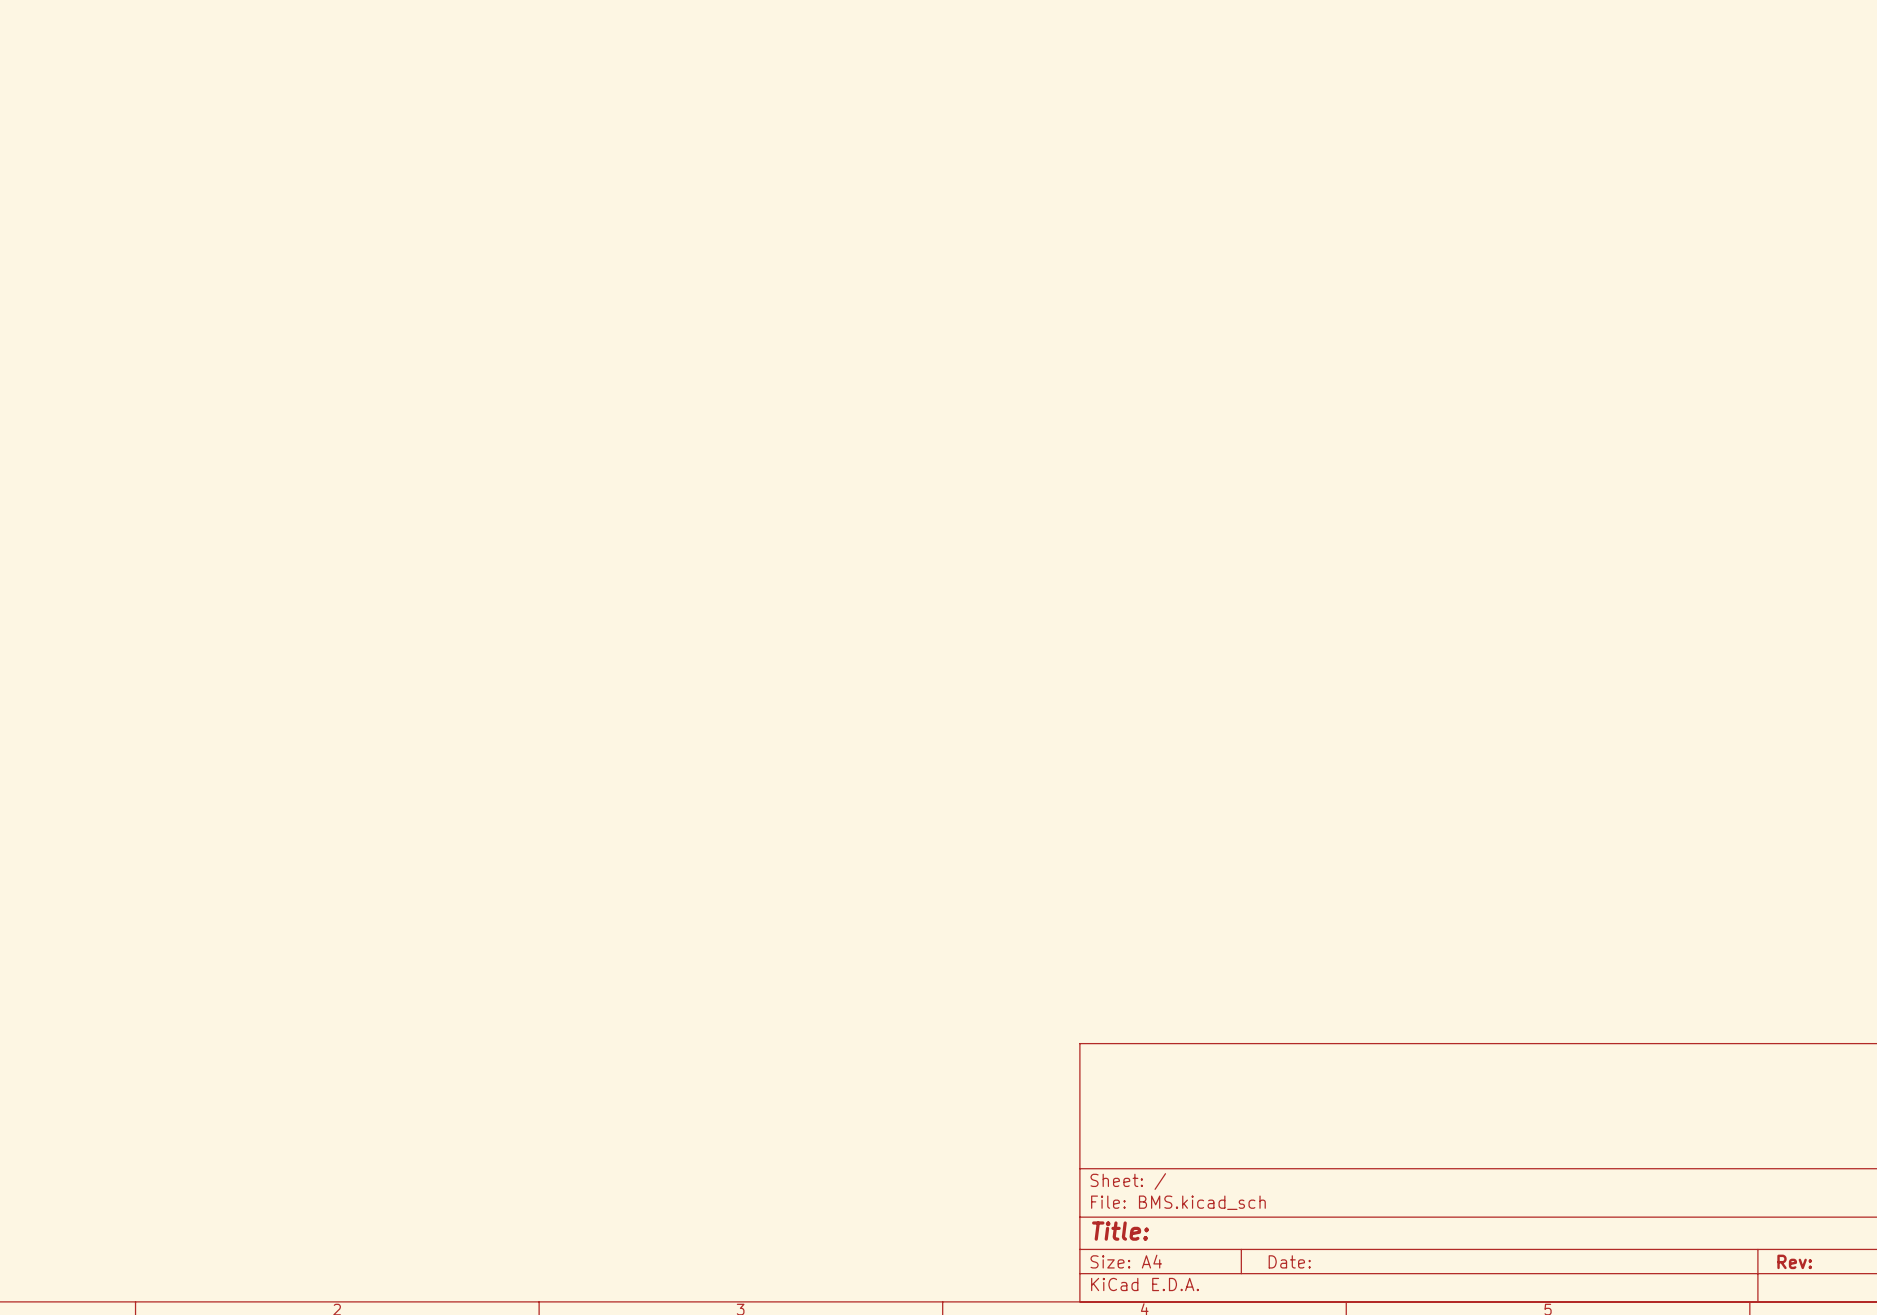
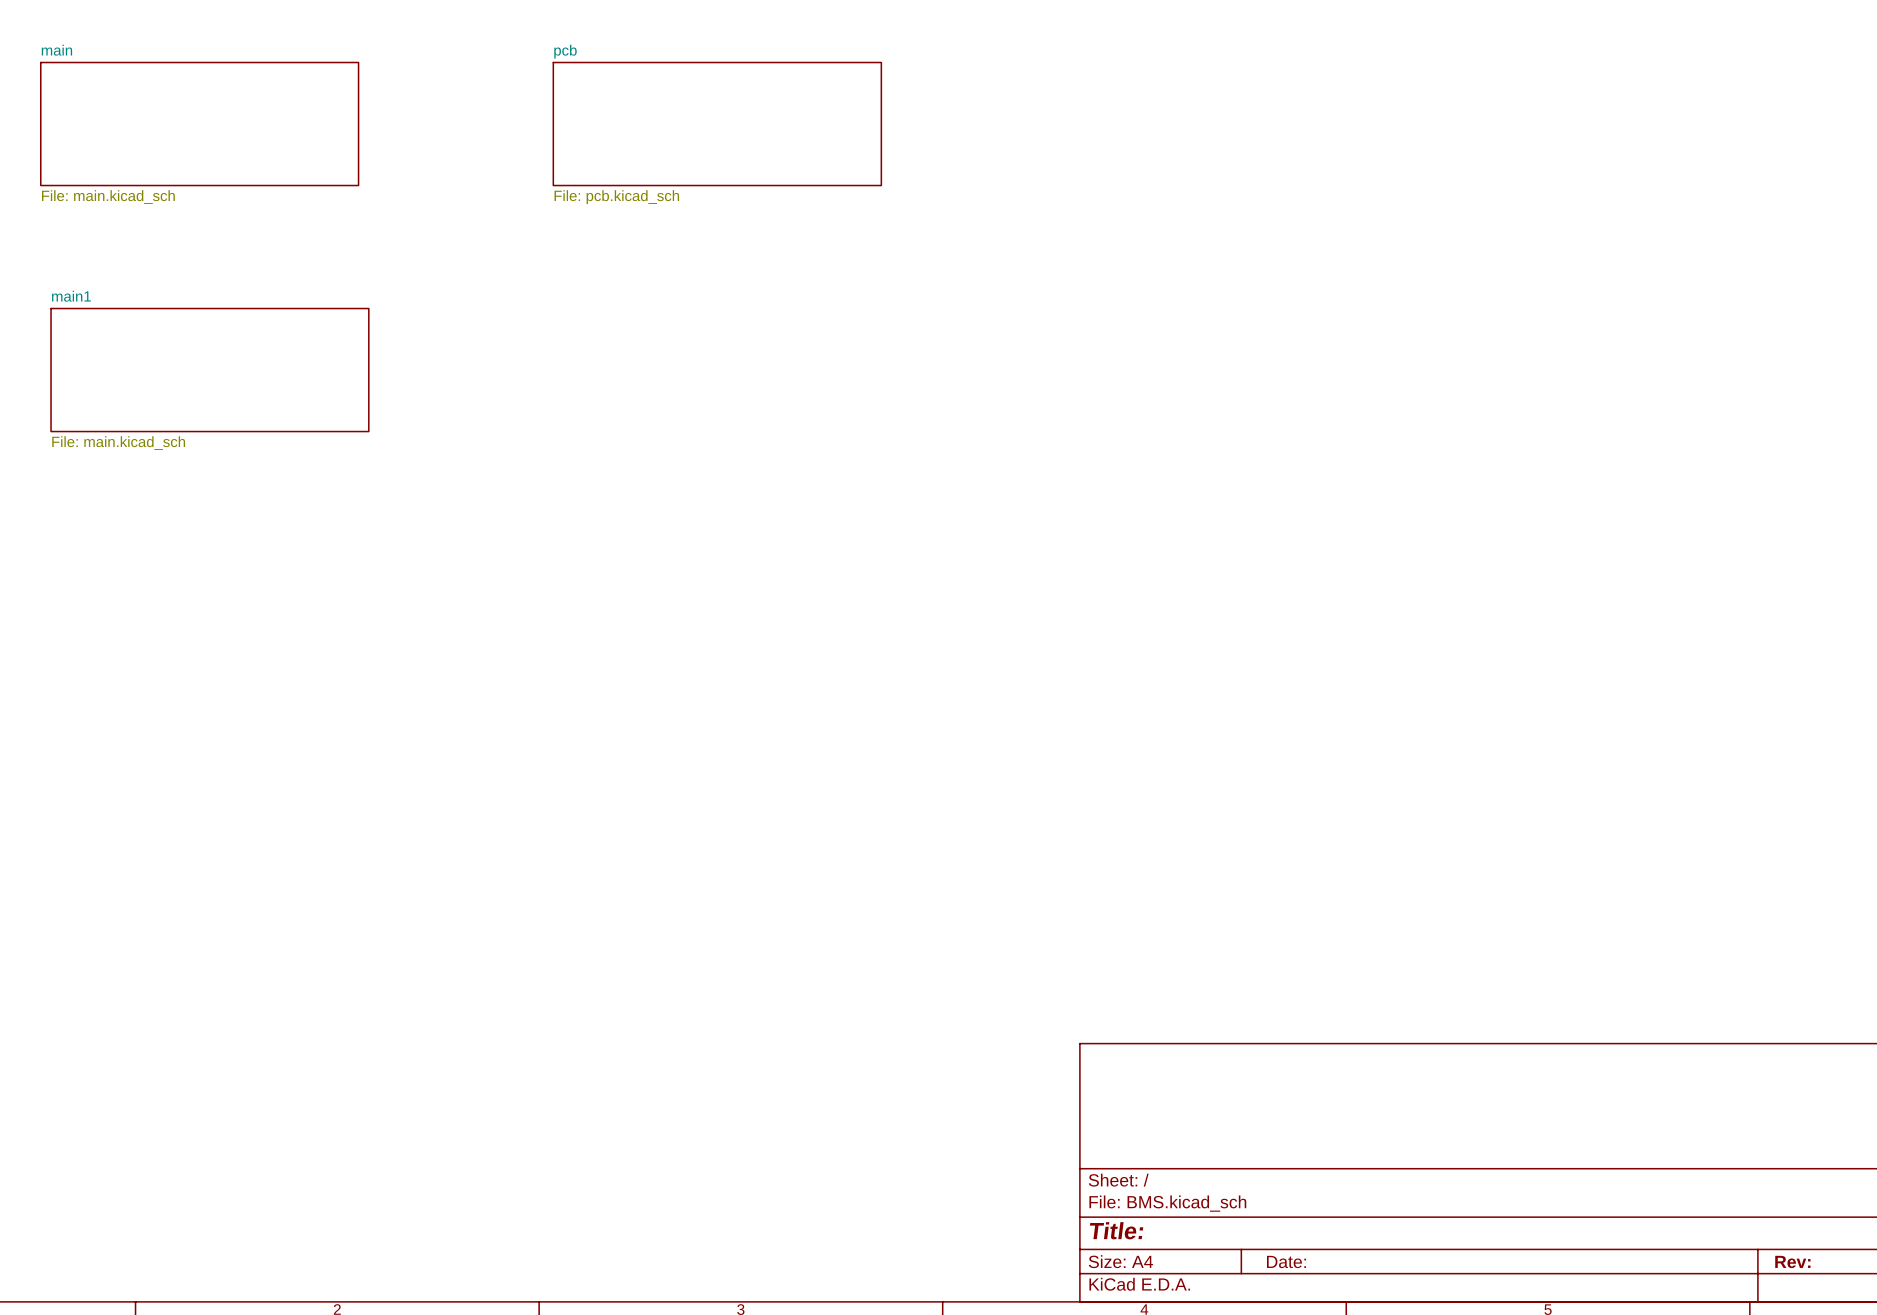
sheet main: none -> File: main.kicad_sch (199, 124)
sheet pcb: none -> File: pcb.kicad_sch (717, 124)
sheet main1: none -> File: main.kicad_sch (209, 370)

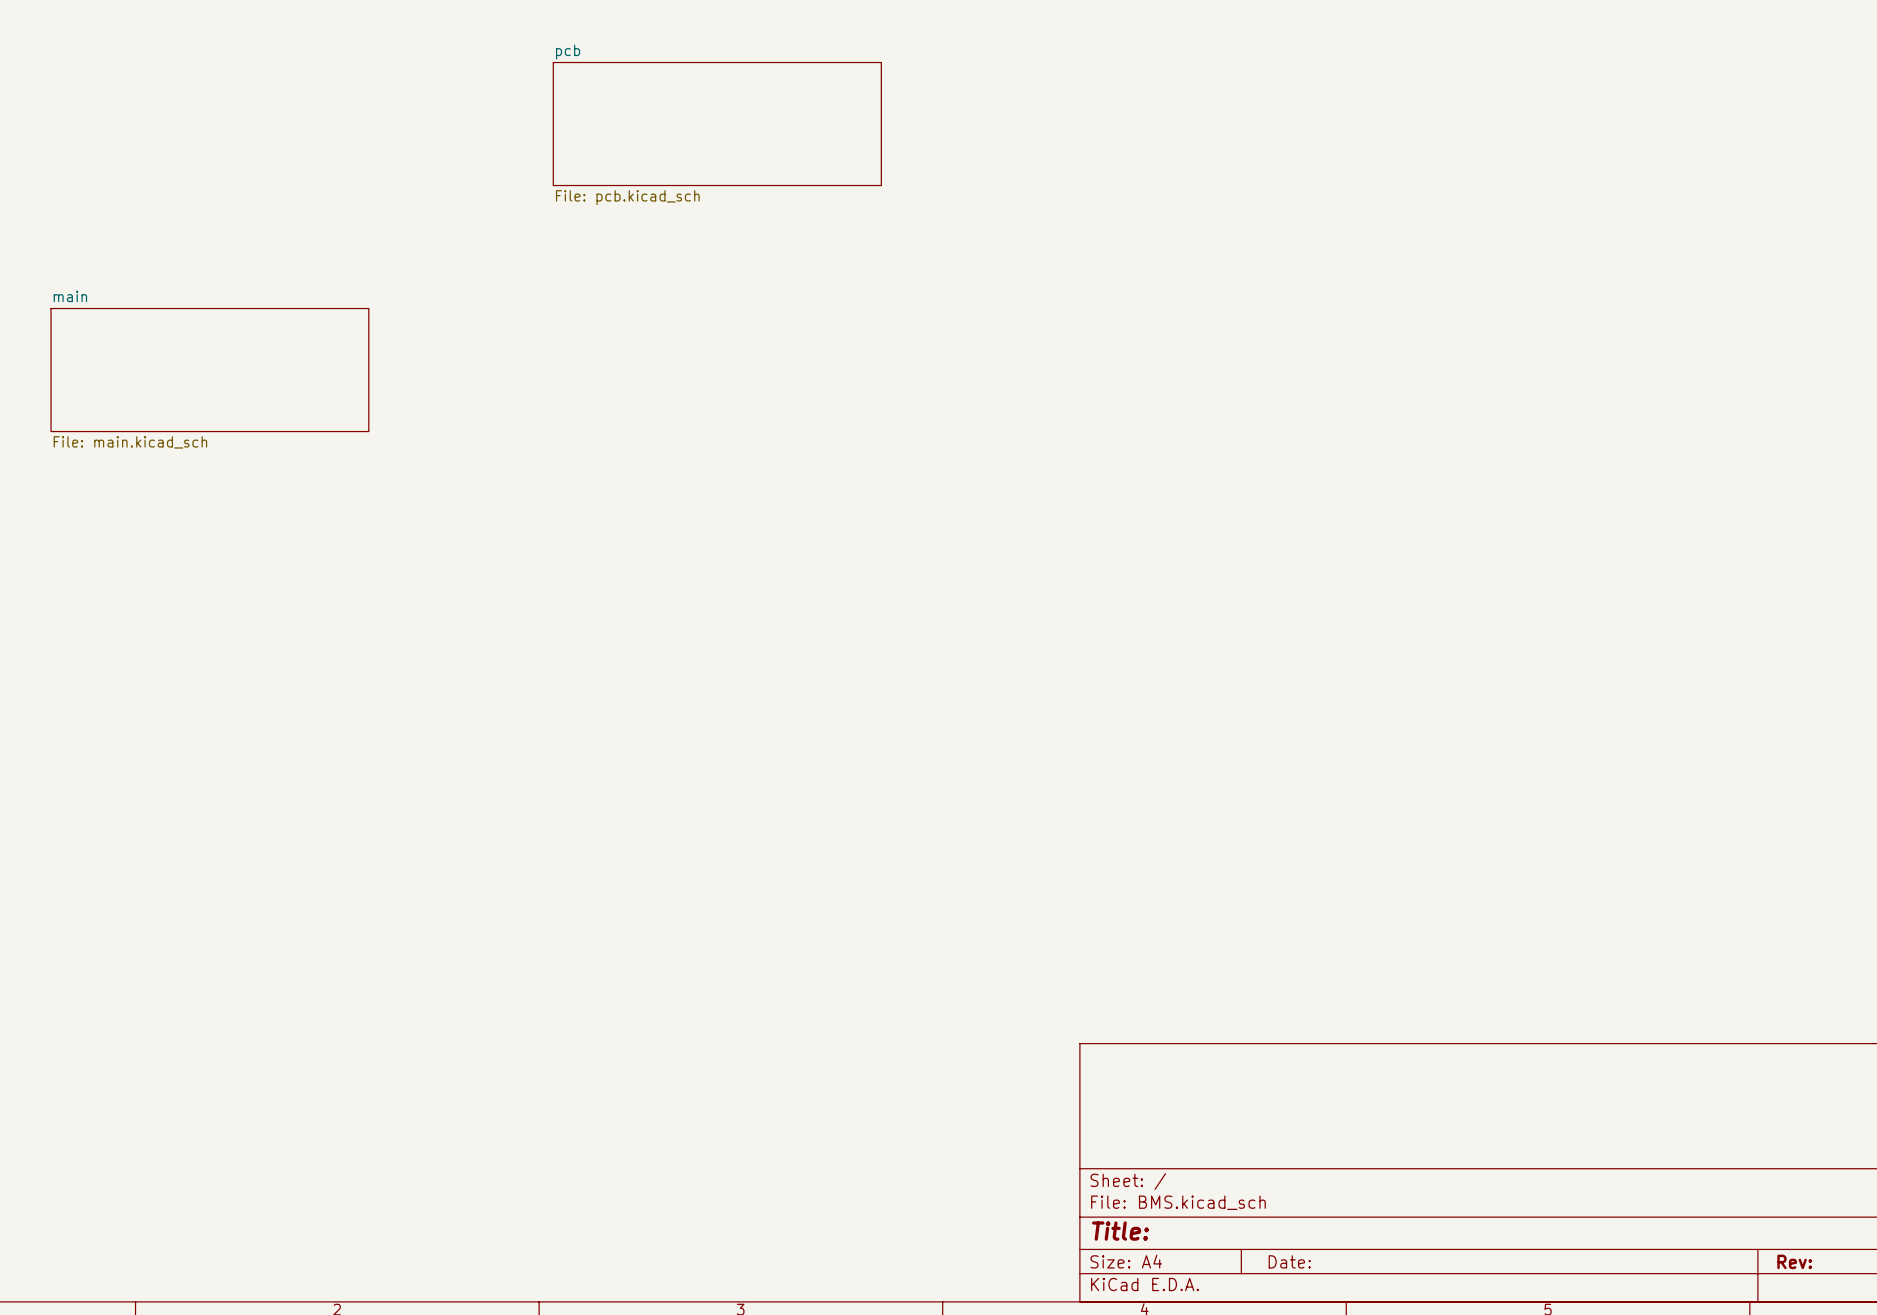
sheet main: File: main.kicad_sch (199, 124) -> none
sheet main1 name: main1 (71, 296) -> main (70, 296)

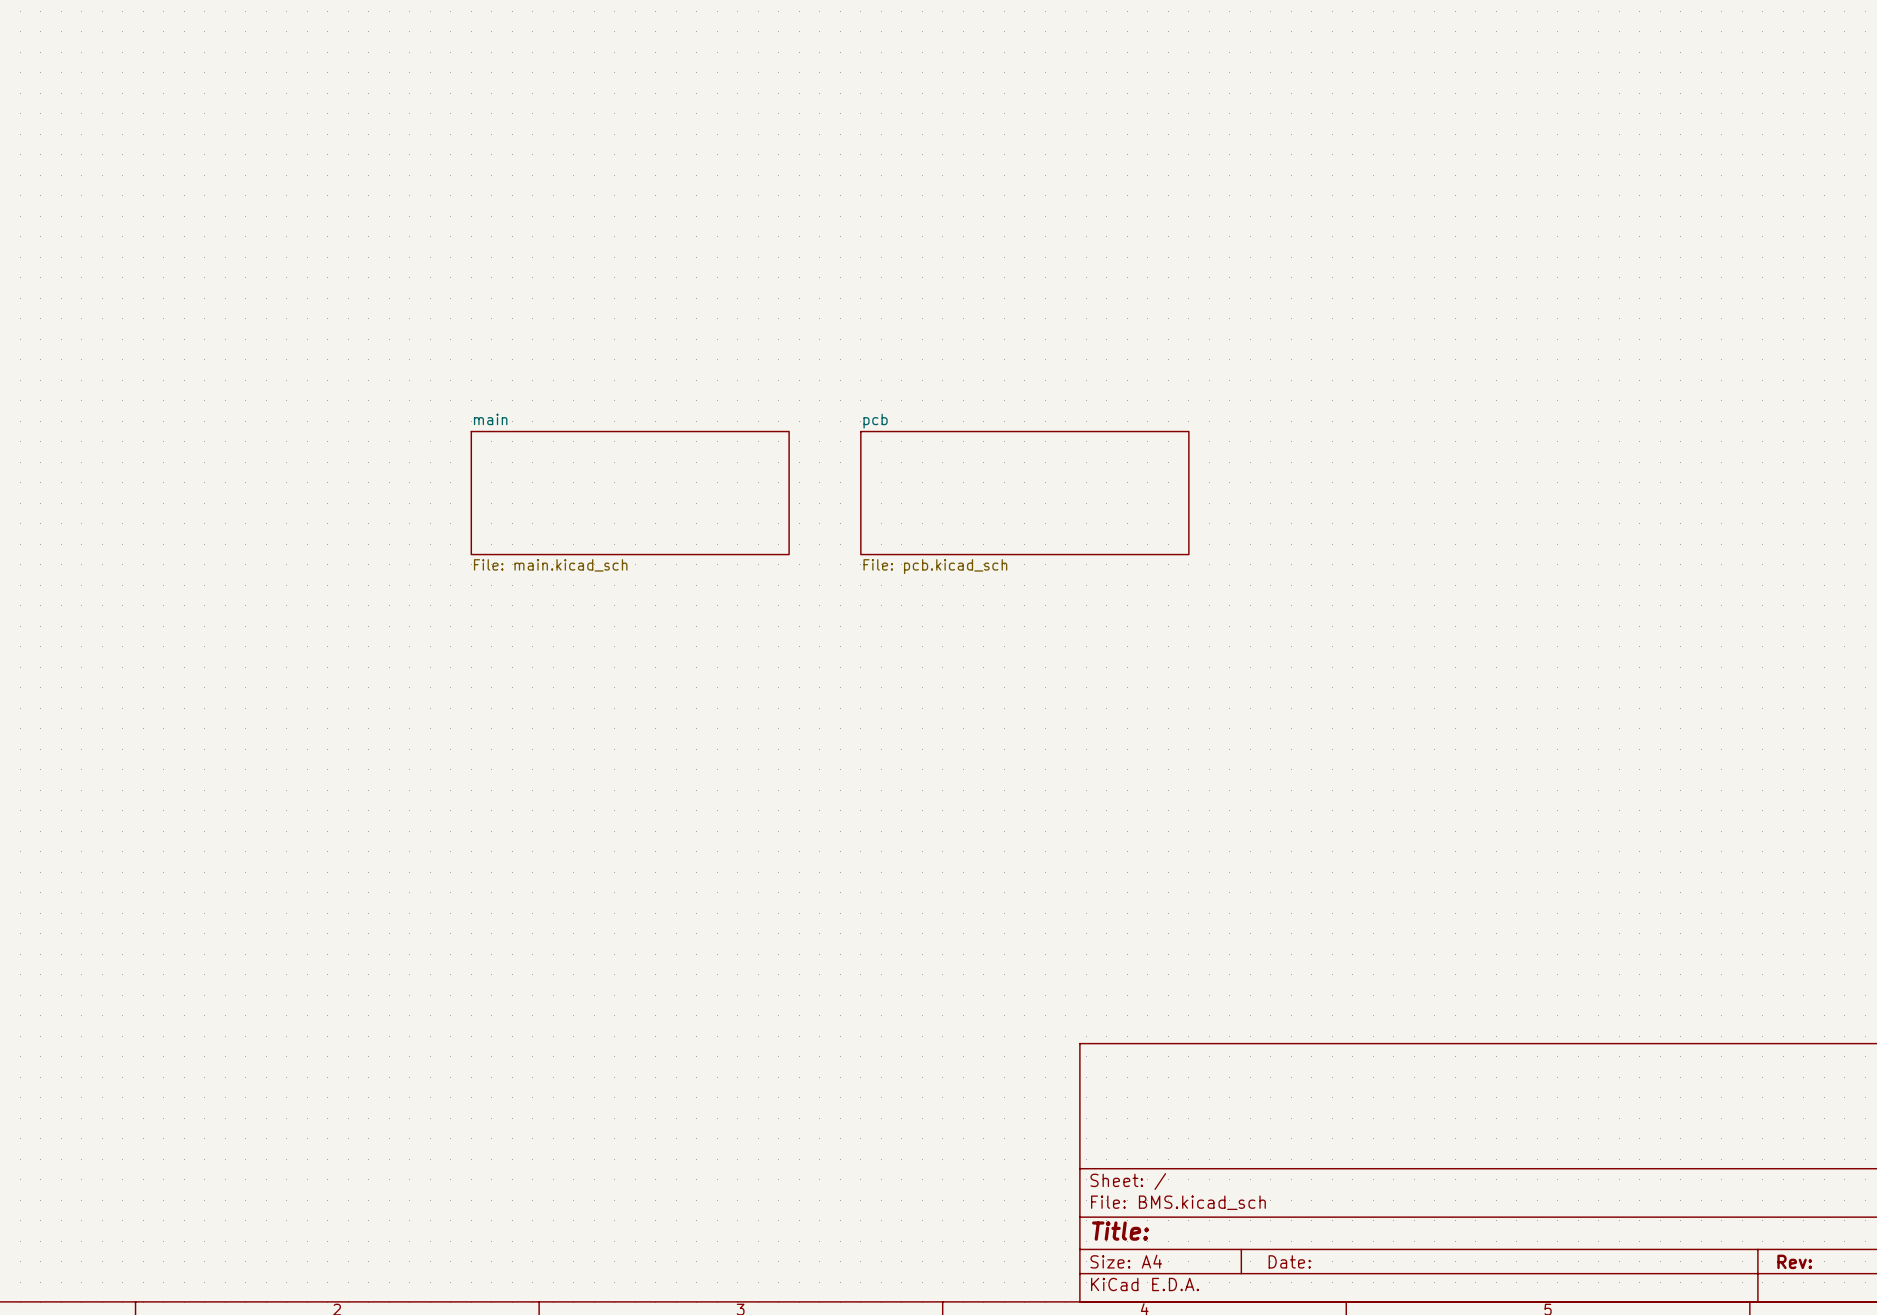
sheet pcb: File: pcb.kicad_sch (717, 124) -> none
sheet main: File: main.kicad_sch (209, 370) -> none
sheet main: none -> File: main.kicad_sch (630, 493)
sheet pcb: none -> File: pcb.kicad_sch (1024, 493)

